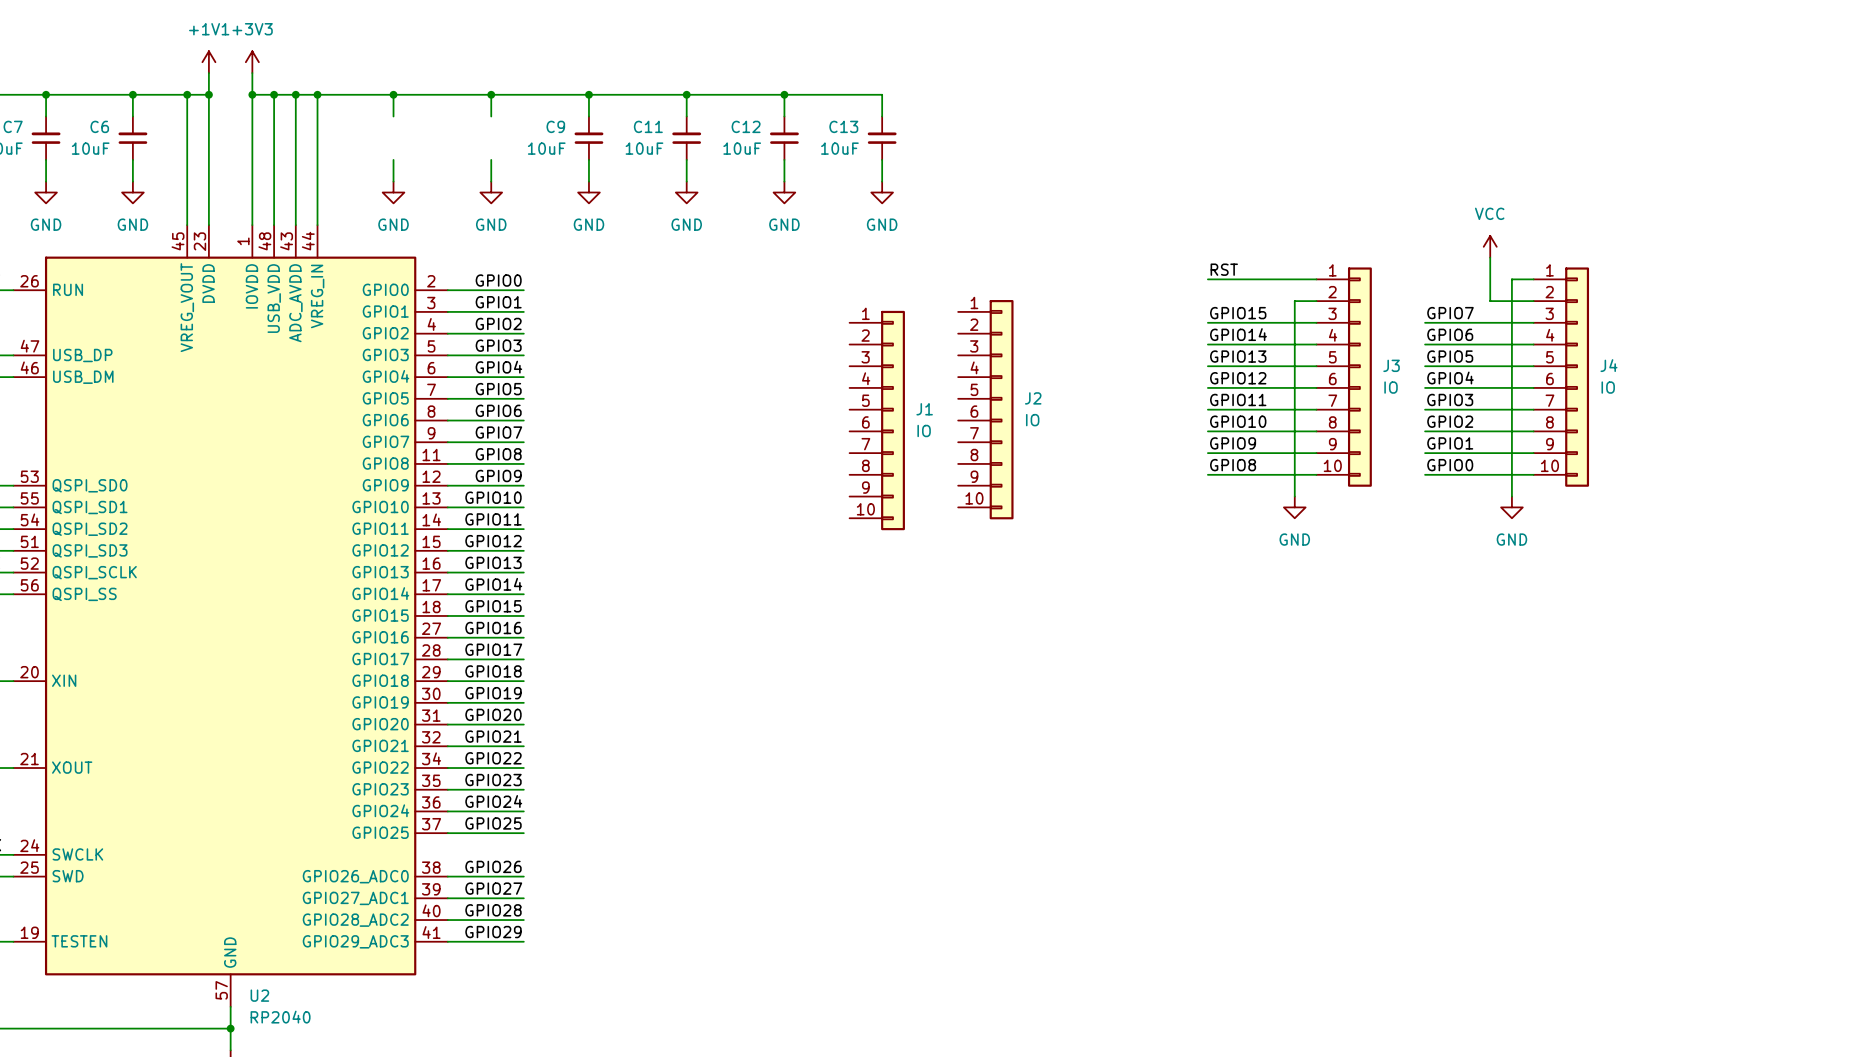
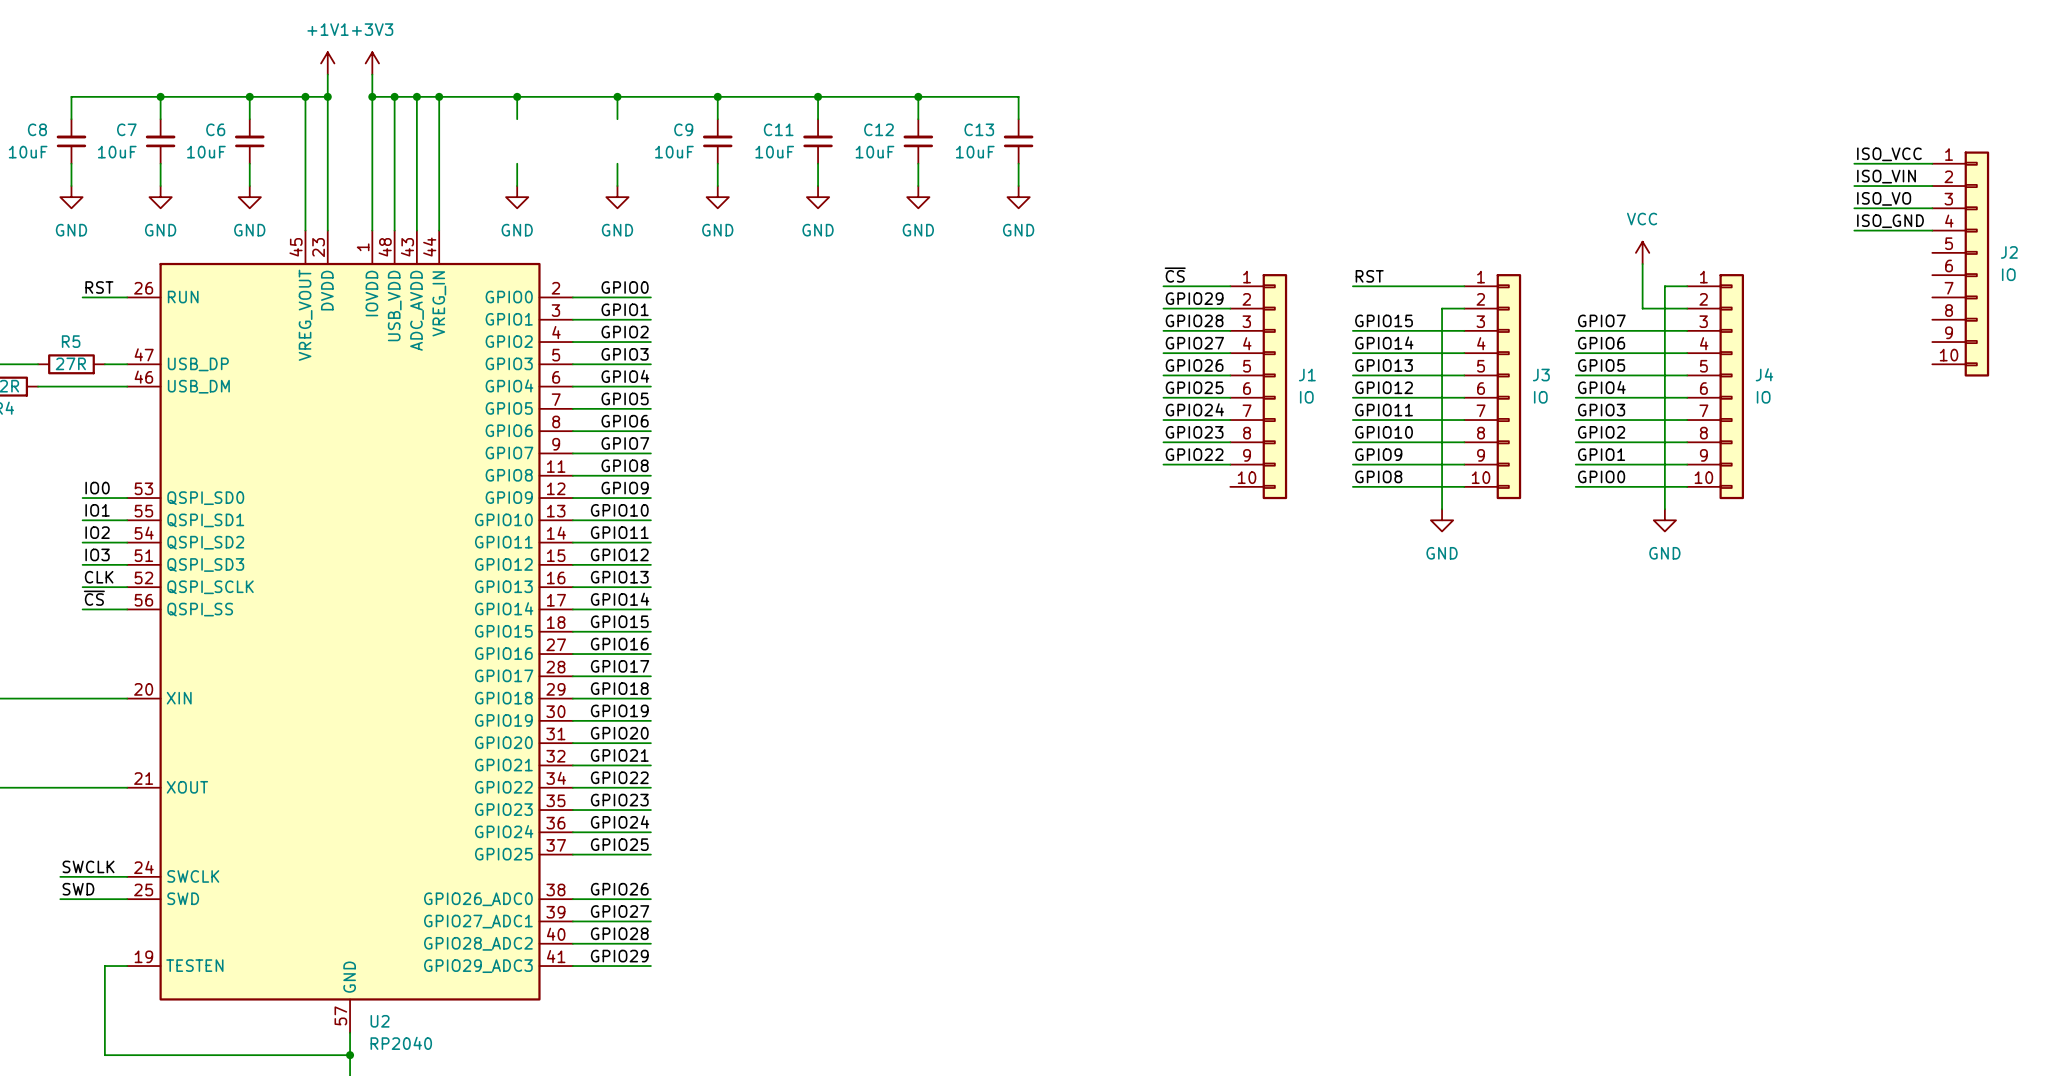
label: none -> ISO_VCC (1889, 154)
wire: none -> (1854, 163) (1932, 163)
label: none -> ISO_VIN (1886, 176)
wire: none -> (1854, 186) (1932, 186)
label: none -> ISO_VO (1884, 198)
wire: none -> (1854, 208) (1932, 208)
label: none -> ISO_GND (1890, 221)
wire: none -> (1854, 230) (1932, 230)
label: none -> ~{CS} (1175, 275)
wire: none -> (1163, 286) (1230, 286)
label: none -> GPIO29 (1194, 298)
wire: none -> (1163, 308) (1230, 308)
label: none -> GPIO28 (1194, 320)
wire: none -> (1163, 330) (1230, 330)
label: none -> GPIO27 (1194, 343)
wire: none -> (1163, 353) (1230, 353)
label: none -> GPIO26 (1194, 365)
wire: none -> (1163, 375) (1230, 375)
label: none -> GPIO25 (1194, 387)
wire: none -> (1163, 397) (1230, 397)
label: none -> GPIO24 (1194, 409)
J2 position: (985, 409) -> (1960, 264)
wire: none -> (1163, 420) (1230, 420)
J1 position: (877, 420) -> (1258, 386)
label: none -> GPIO23 (1194, 432)
wire: none -> (1163, 442) (1230, 442)
label: none -> GPIO22 (1194, 454)
wire: none -> (1163, 464) (1230, 464)

